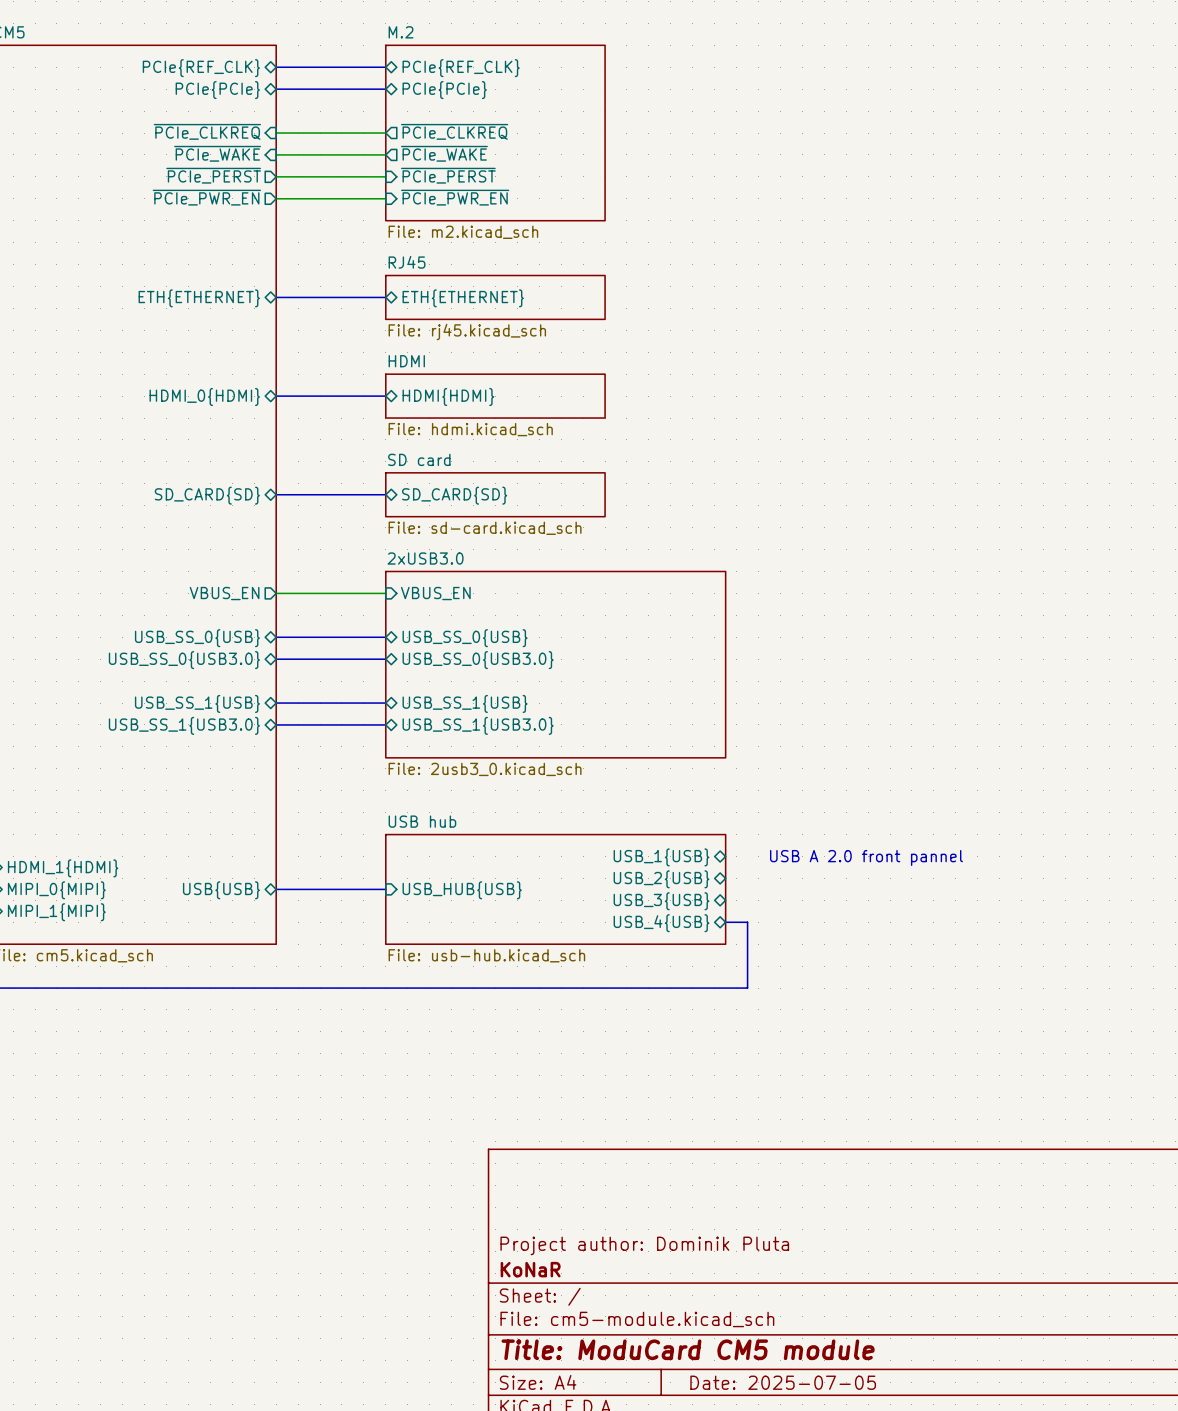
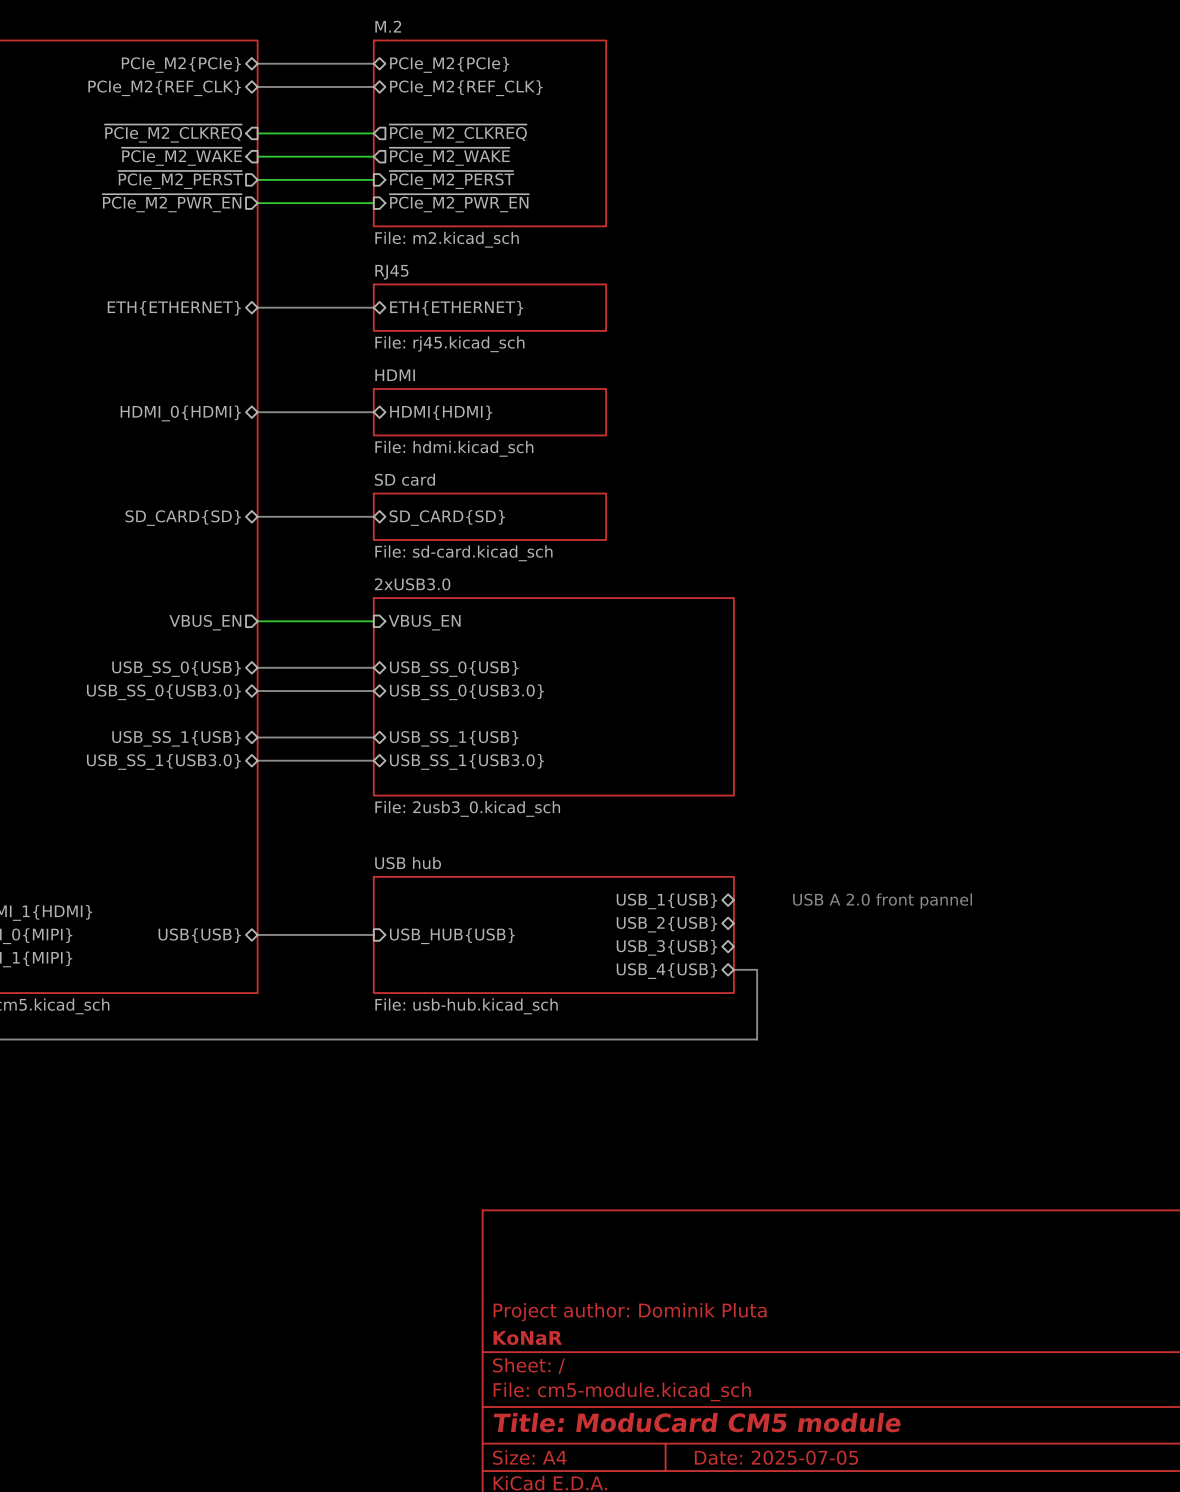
sheet pin: PCIe{REF_CLK} (201, 68) -> PCIe_M2{PCIe} (181, 64)
sheet pin: PCIe{REF_CLK} (461, 68) -> PCIe_M2{PCIe} (449, 64)
sheet pin: PCIe{PCIe} (217, 90) -> PCIe_M2{REF_CLK} (164, 88)
sheet pin: PCIe{PCIe} (444, 90) -> PCIe_M2{REF_CLK} (466, 88)
sheet pin: ~{PCIe_CLKREQ} (207, 131) -> ~{PCIe_M2_CLKREQ} (173, 133)
sheet pin: ~{PCIe_CLKREQ} (454, 131) -> ~{PCIe_M2_CLKREQ} (458, 133)
sheet pin: ~{PCIe_WAKE} (217, 153) -> ~{PCIe_M2_WAKE} (181, 156)
sheet pin: ~{PCIe_WAKE} (444, 153) -> ~{PCIe_M2_WAKE} (449, 156)
sheet pin: ~{PCIe_PERST} (213, 175) -> ~{PCIe_M2_PERST} (180, 180)
sheet pin: ~{PCIe_PERST} (448, 175) -> ~{PCIe_M2_PERST} (451, 180)
sheet pin: ~{PCIe_PWR_EN} (206, 197) -> ~{PCIe_M2_PWR_EN} (172, 203)
sheet pin: ~{PCIe_PWR_EN} (455, 197) -> ~{PCIe_M2_PWR_EN} (459, 203)

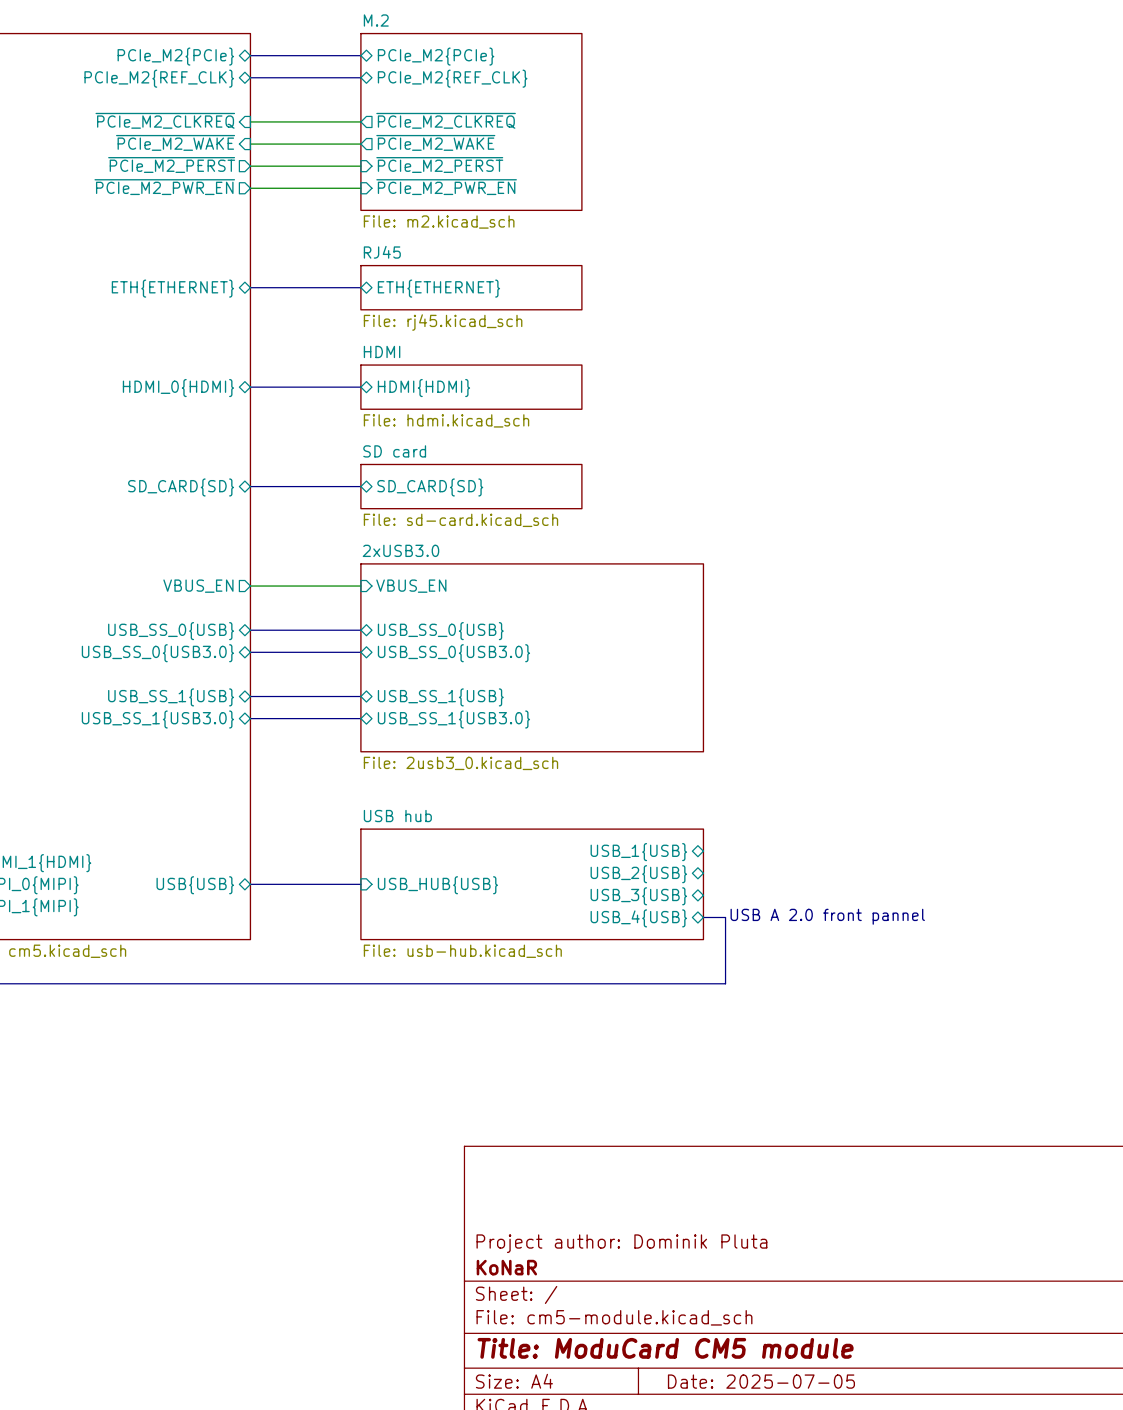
text position: USB A 2.0 front pannel (882, 901) -> USB A 2.0 front pannel (827, 916)

